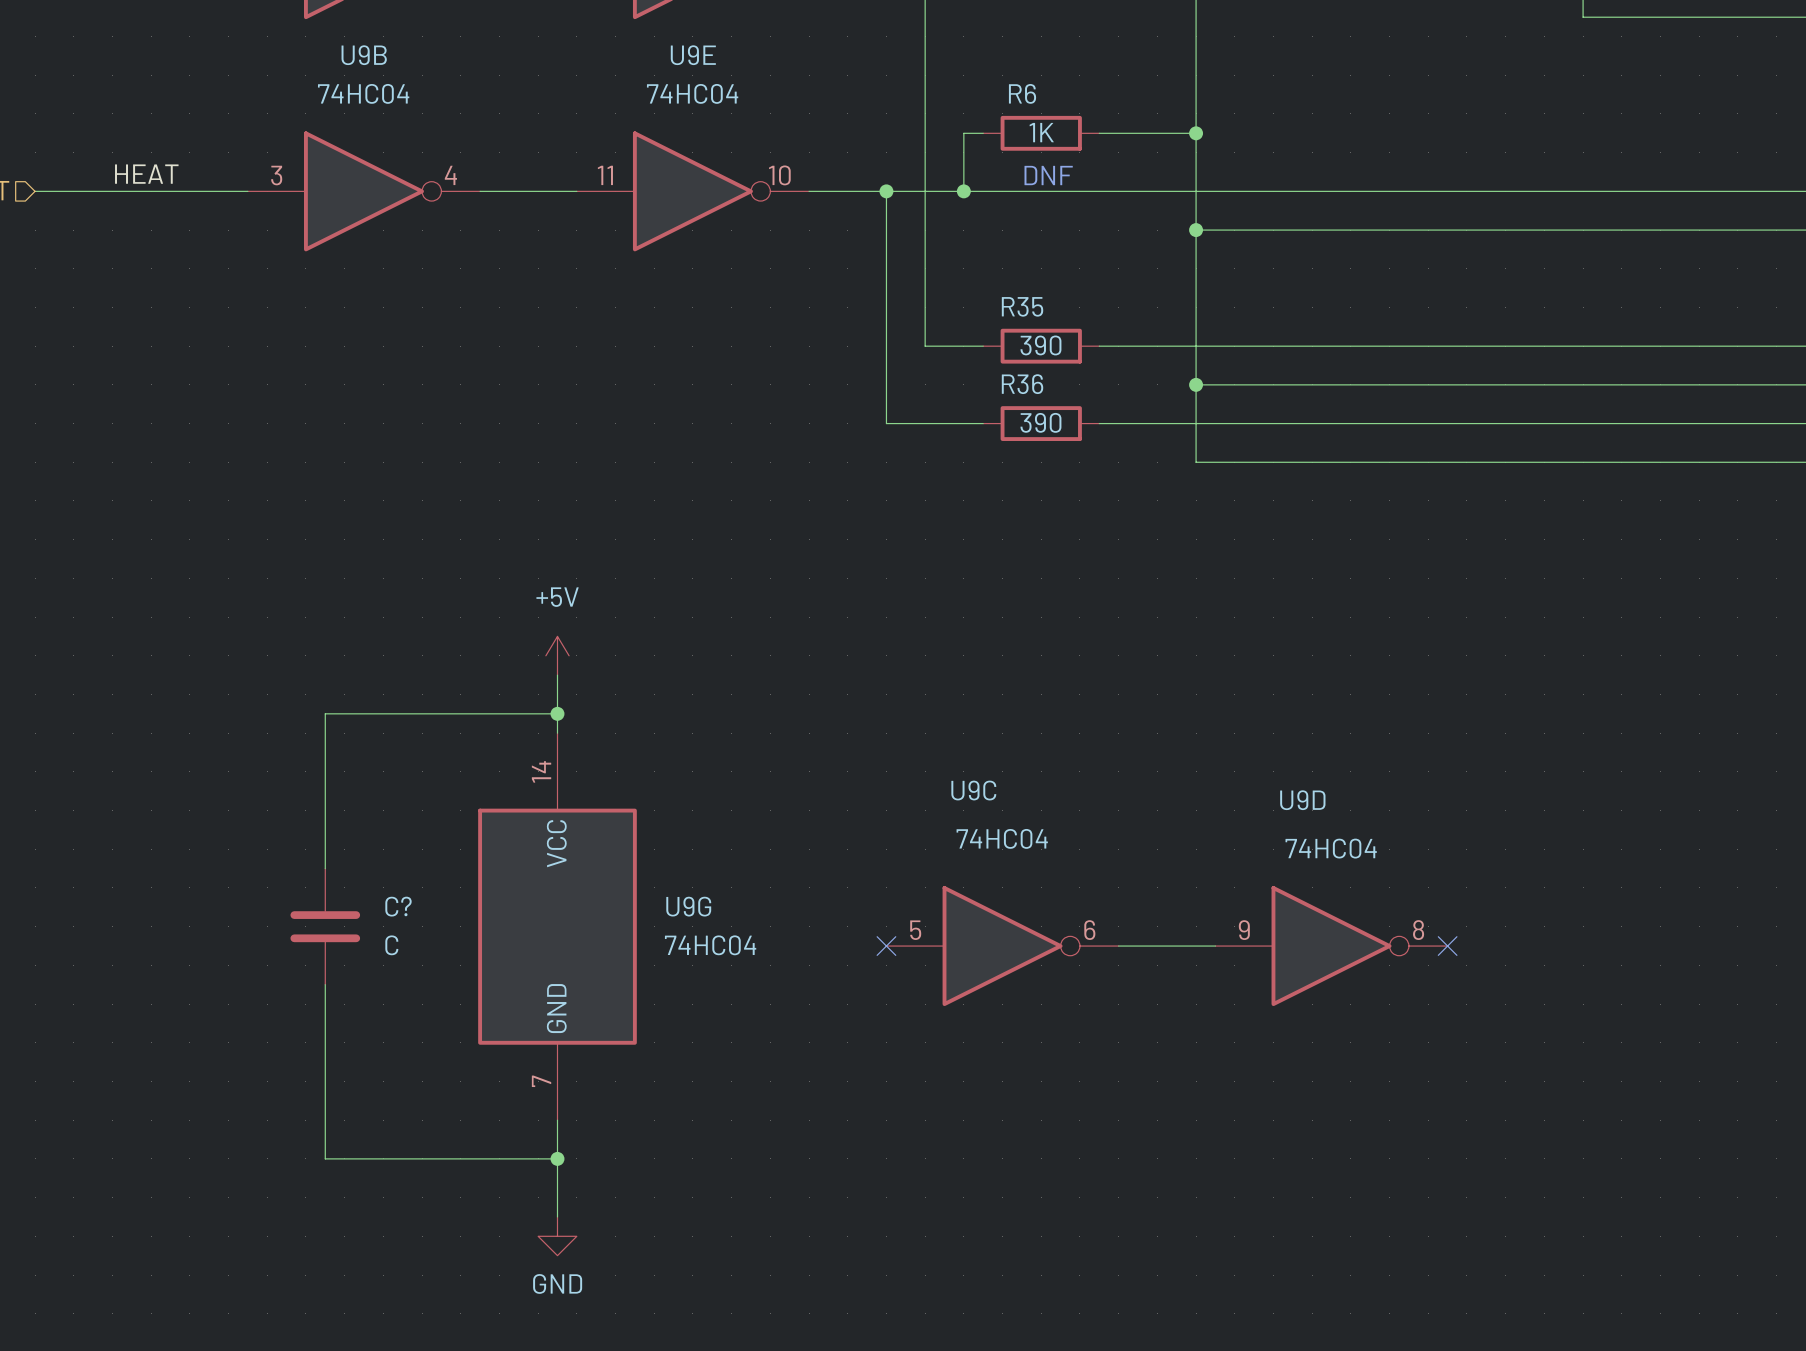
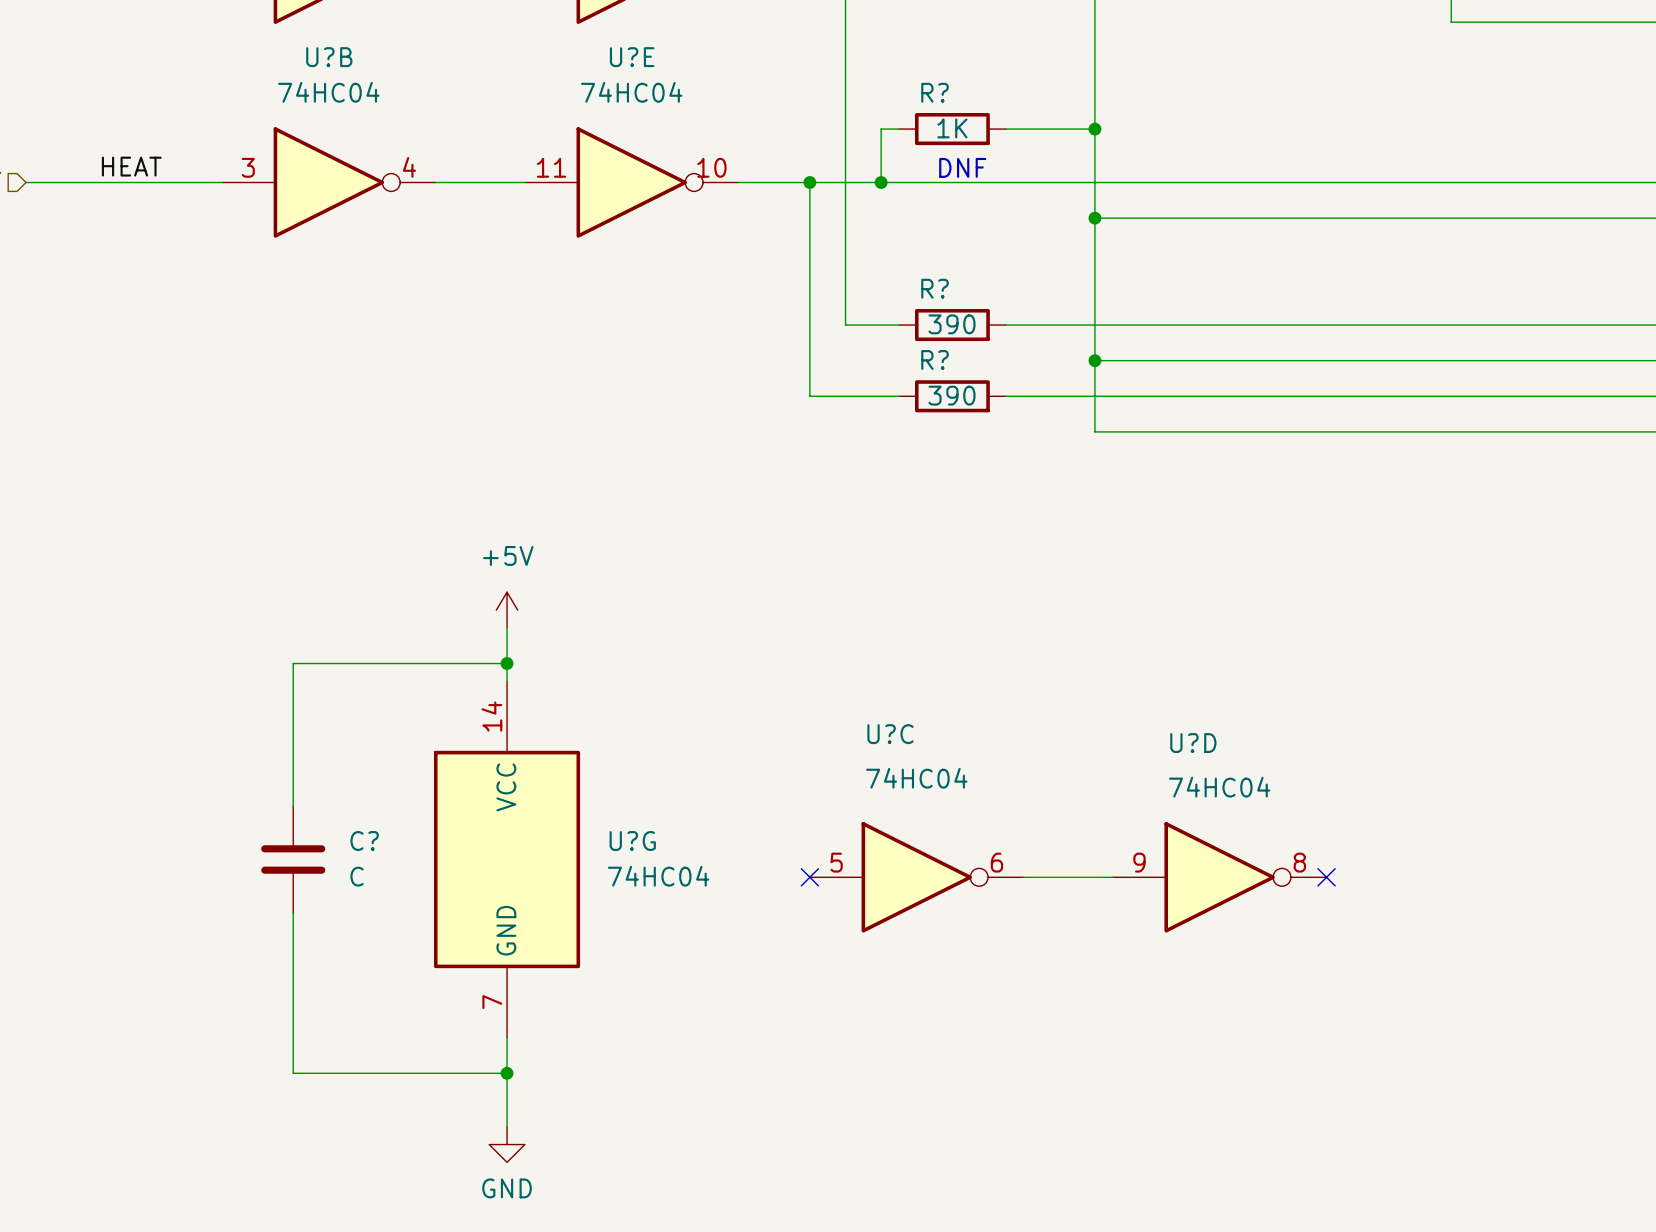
U9B name: U9B (364, 55) -> U?B (329, 57)
U9E name: U9E (693, 55) -> U?E (632, 57)
R6 name: R6 (1022, 93) -> R? (935, 92)
R35 name: R35 (1022, 306) -> R? (935, 288)
R36 name: R36 (1022, 384) -> R? (935, 359)
U9C name: U9C (973, 790) -> U?C (890, 734)
U9D name: U9D (1302, 800) -> U?D (1193, 743)
U9G name: U9G (688, 906) -> U?G (632, 841)

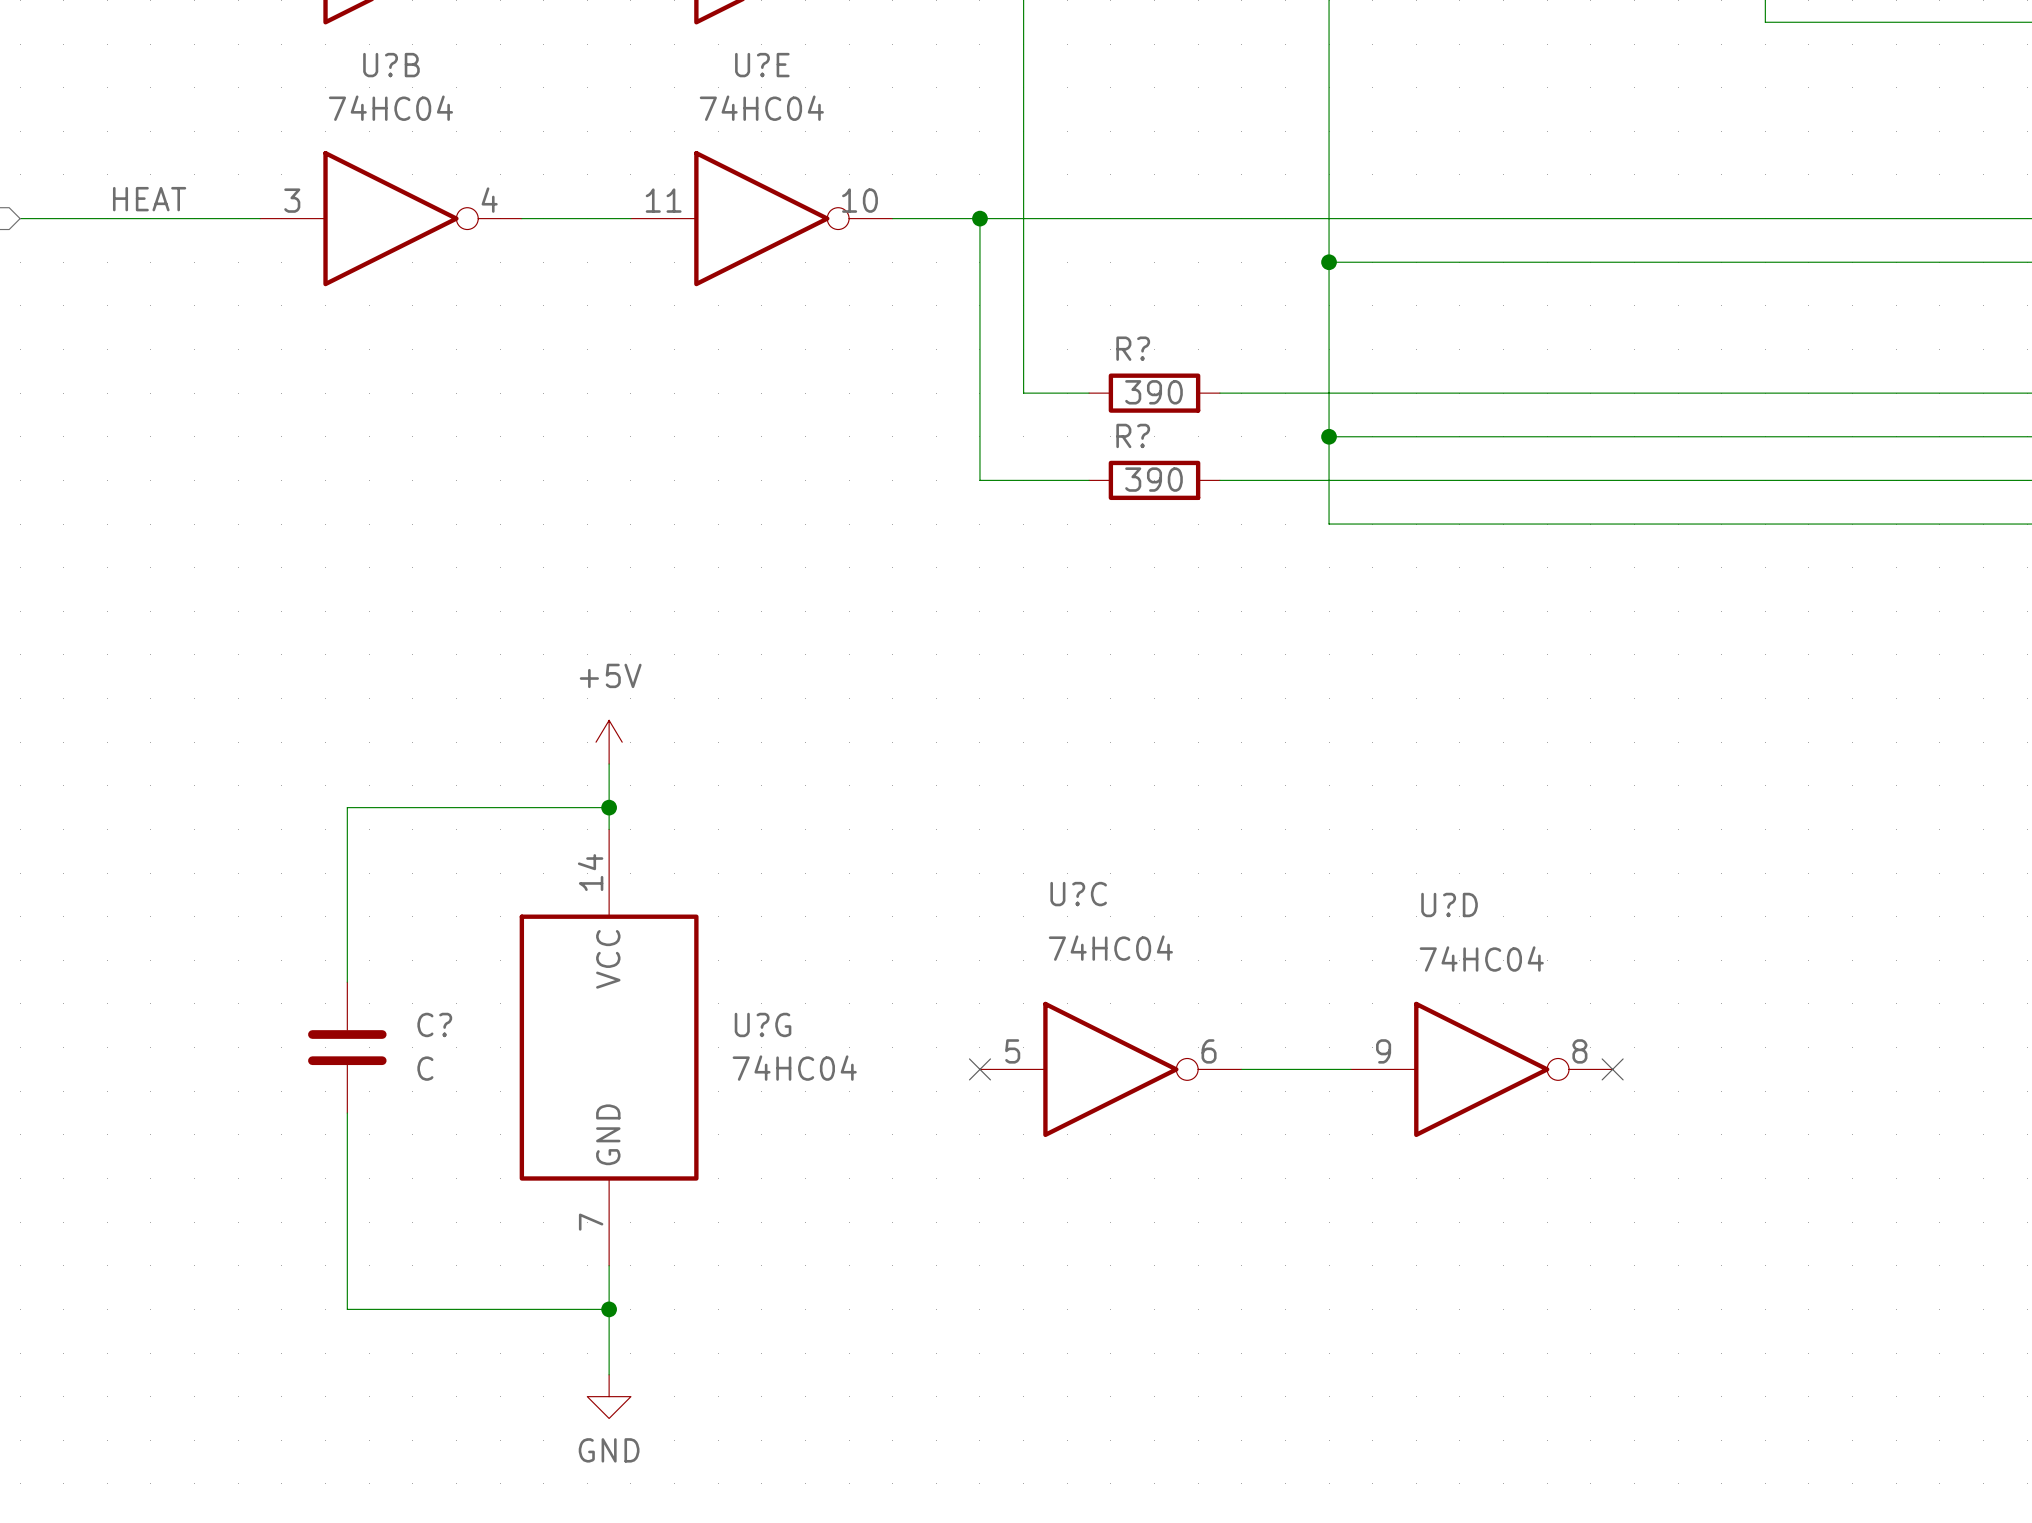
wire: (898, 129) (881, 129) (881, 182) -> none
R?: 1K (952, 129) -> none
wire: (1005, 129) (1094, 129) -> none
junction: (1094, 129) -> none
text: DNF (962, 167) -> none
junction: (881, 182) -> none

